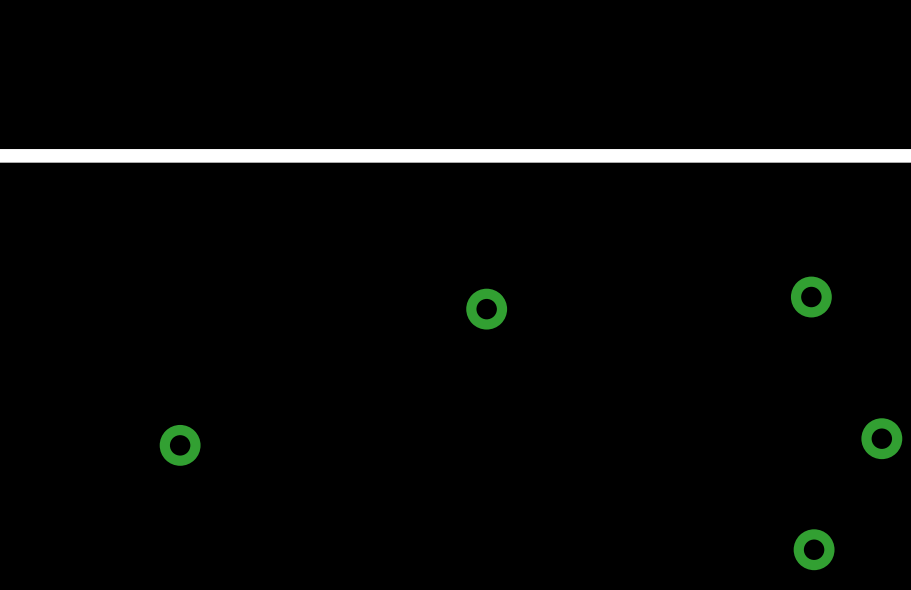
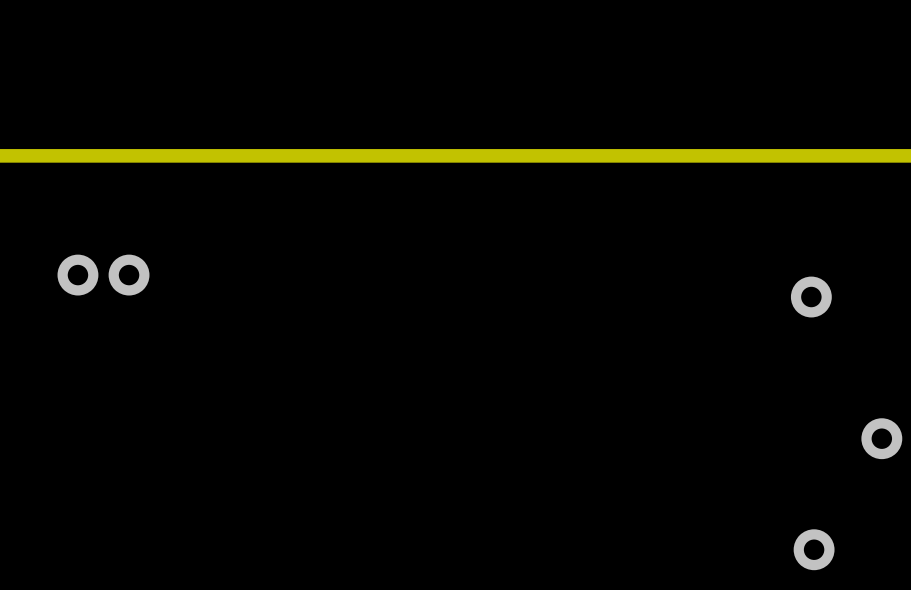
via: none -> (77, 275)
via: none -> (129, 275)
via: (486, 309) -> none
via: (180, 445) -> none

